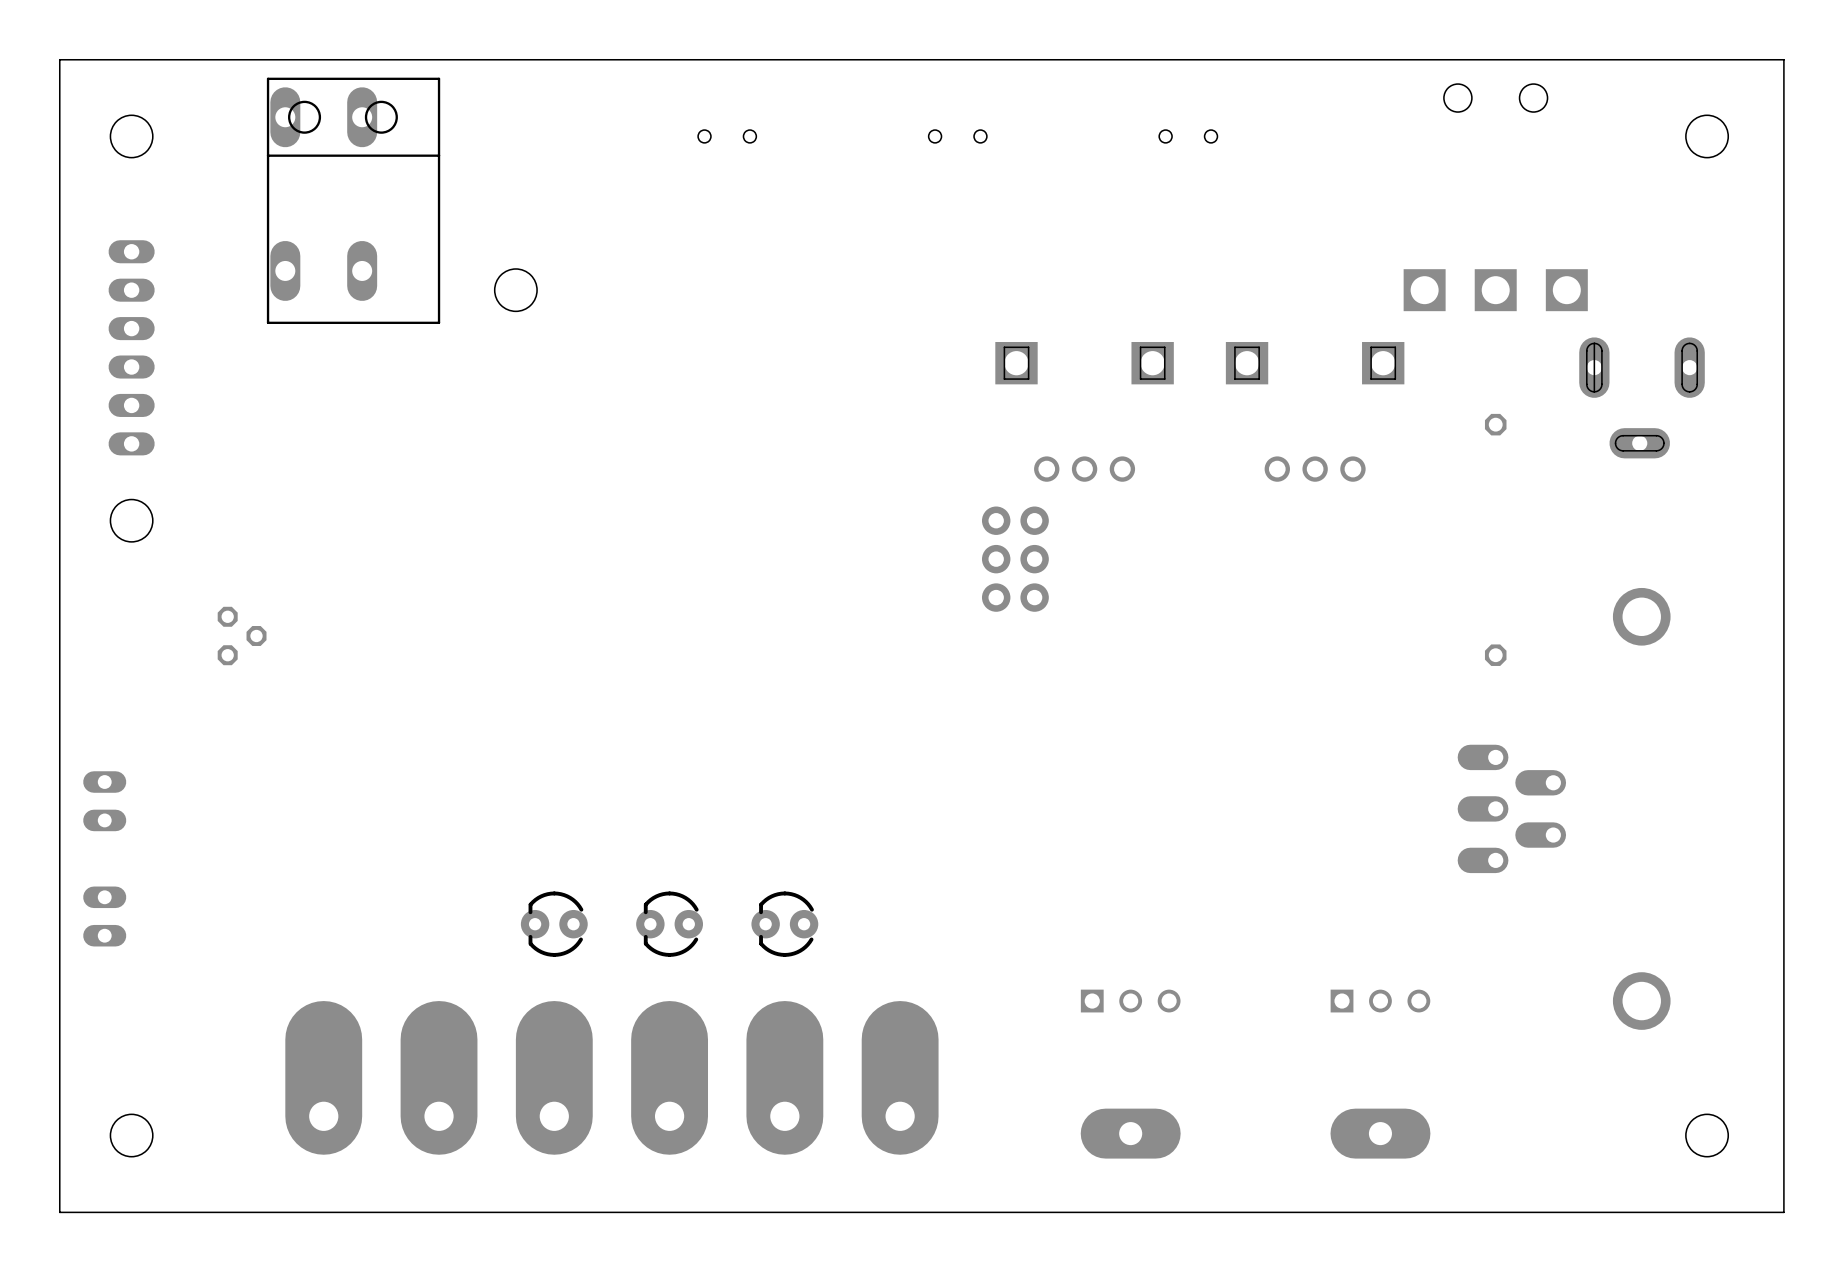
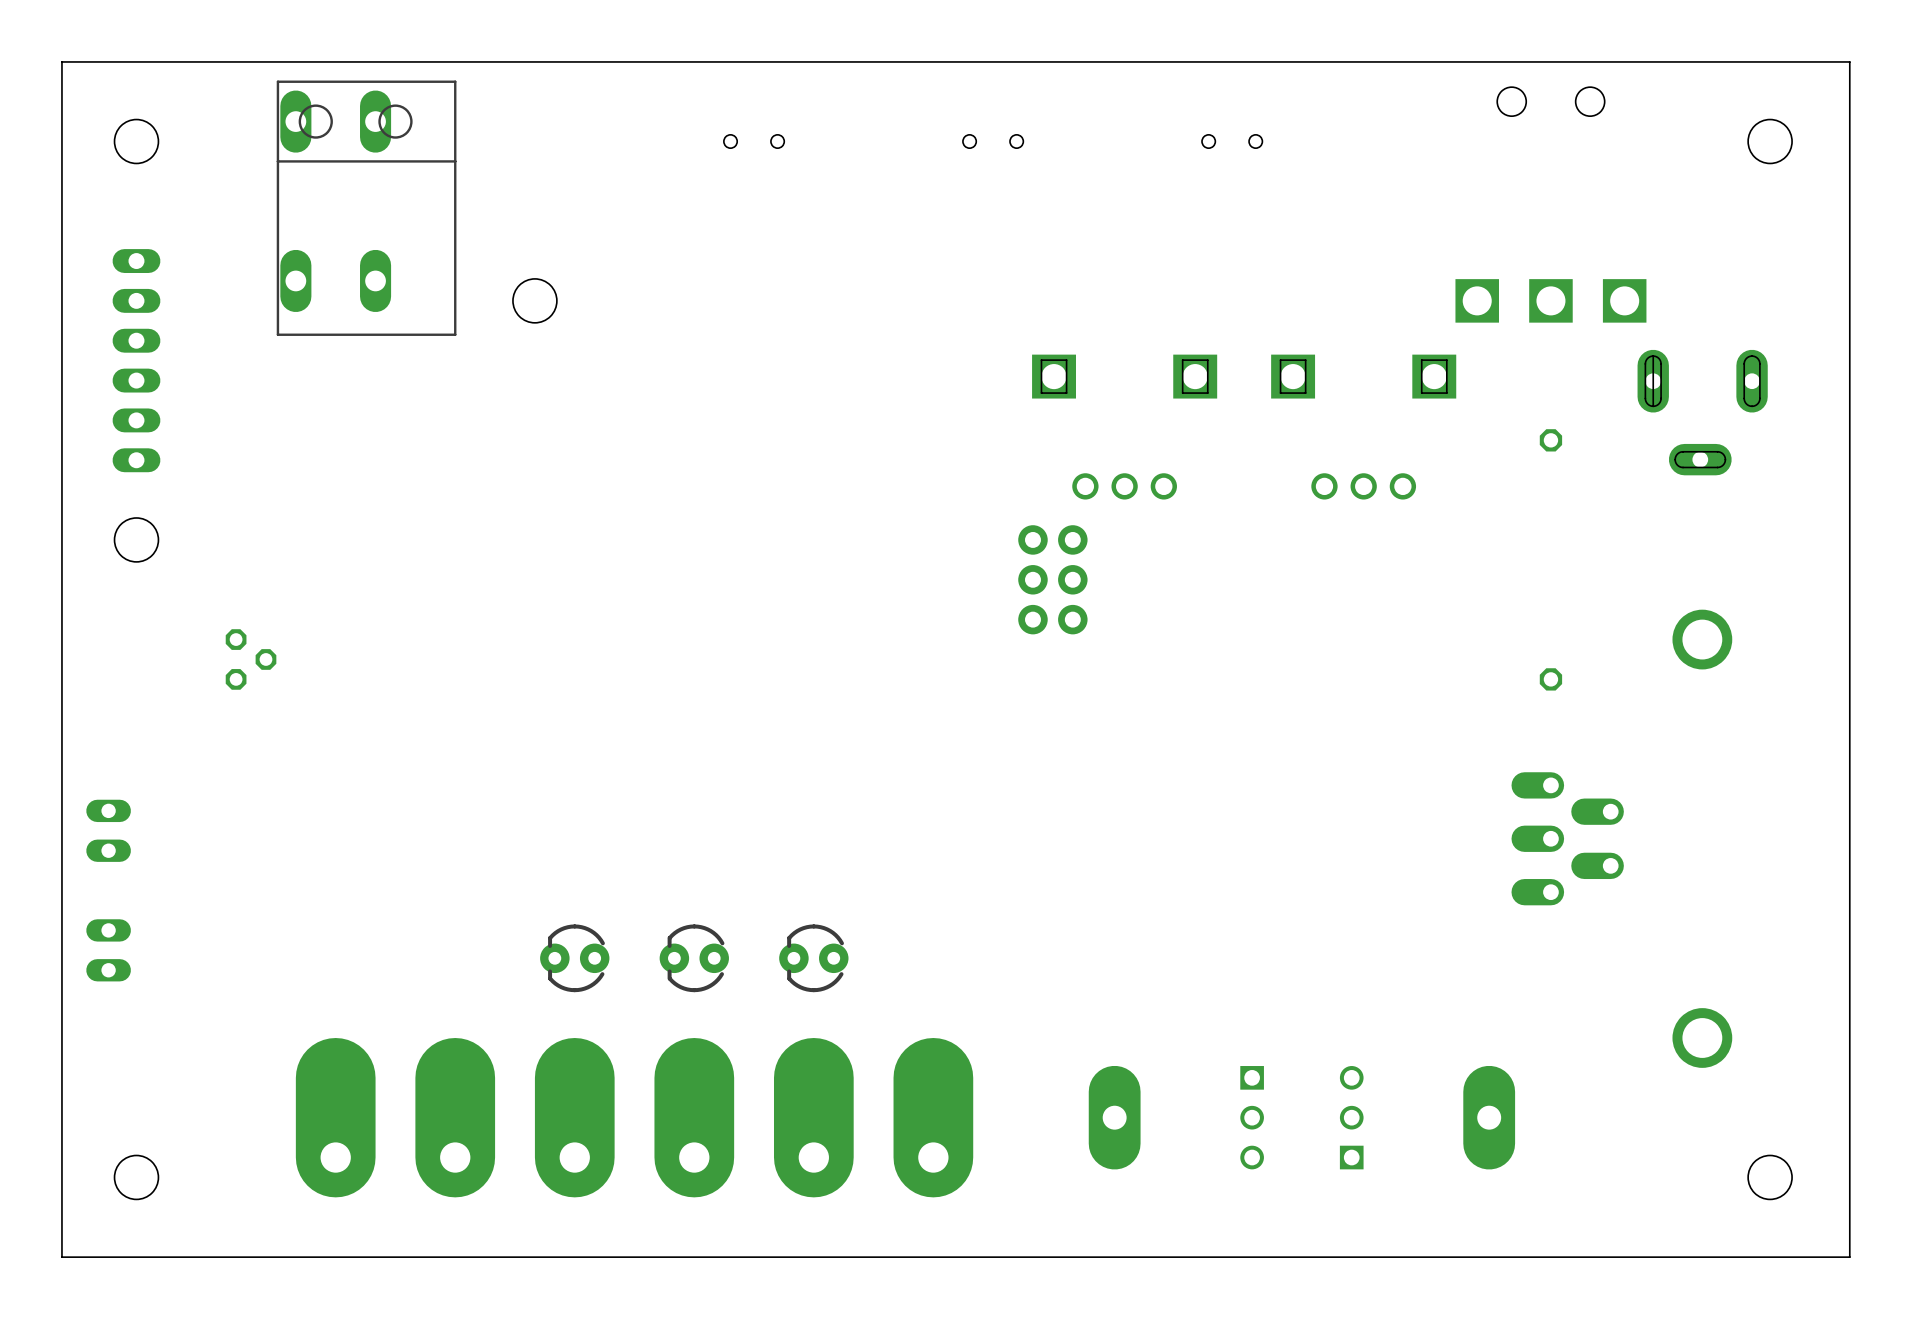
part: (1130, 1001) -> none
part: (1380, 1001) -> none
part: none -> (1252, 1117)
part: none -> (1351, 1117)
part rotation: 0° (1130, 1133) -> 90° clockwise (1114, 1117)
part position: (1130, 1133) -> (1114, 1117)
part rotation: 0° (1380, 1133) -> 90° clockwise (1489, 1117)
part position: (1380, 1133) -> (1489, 1117)

